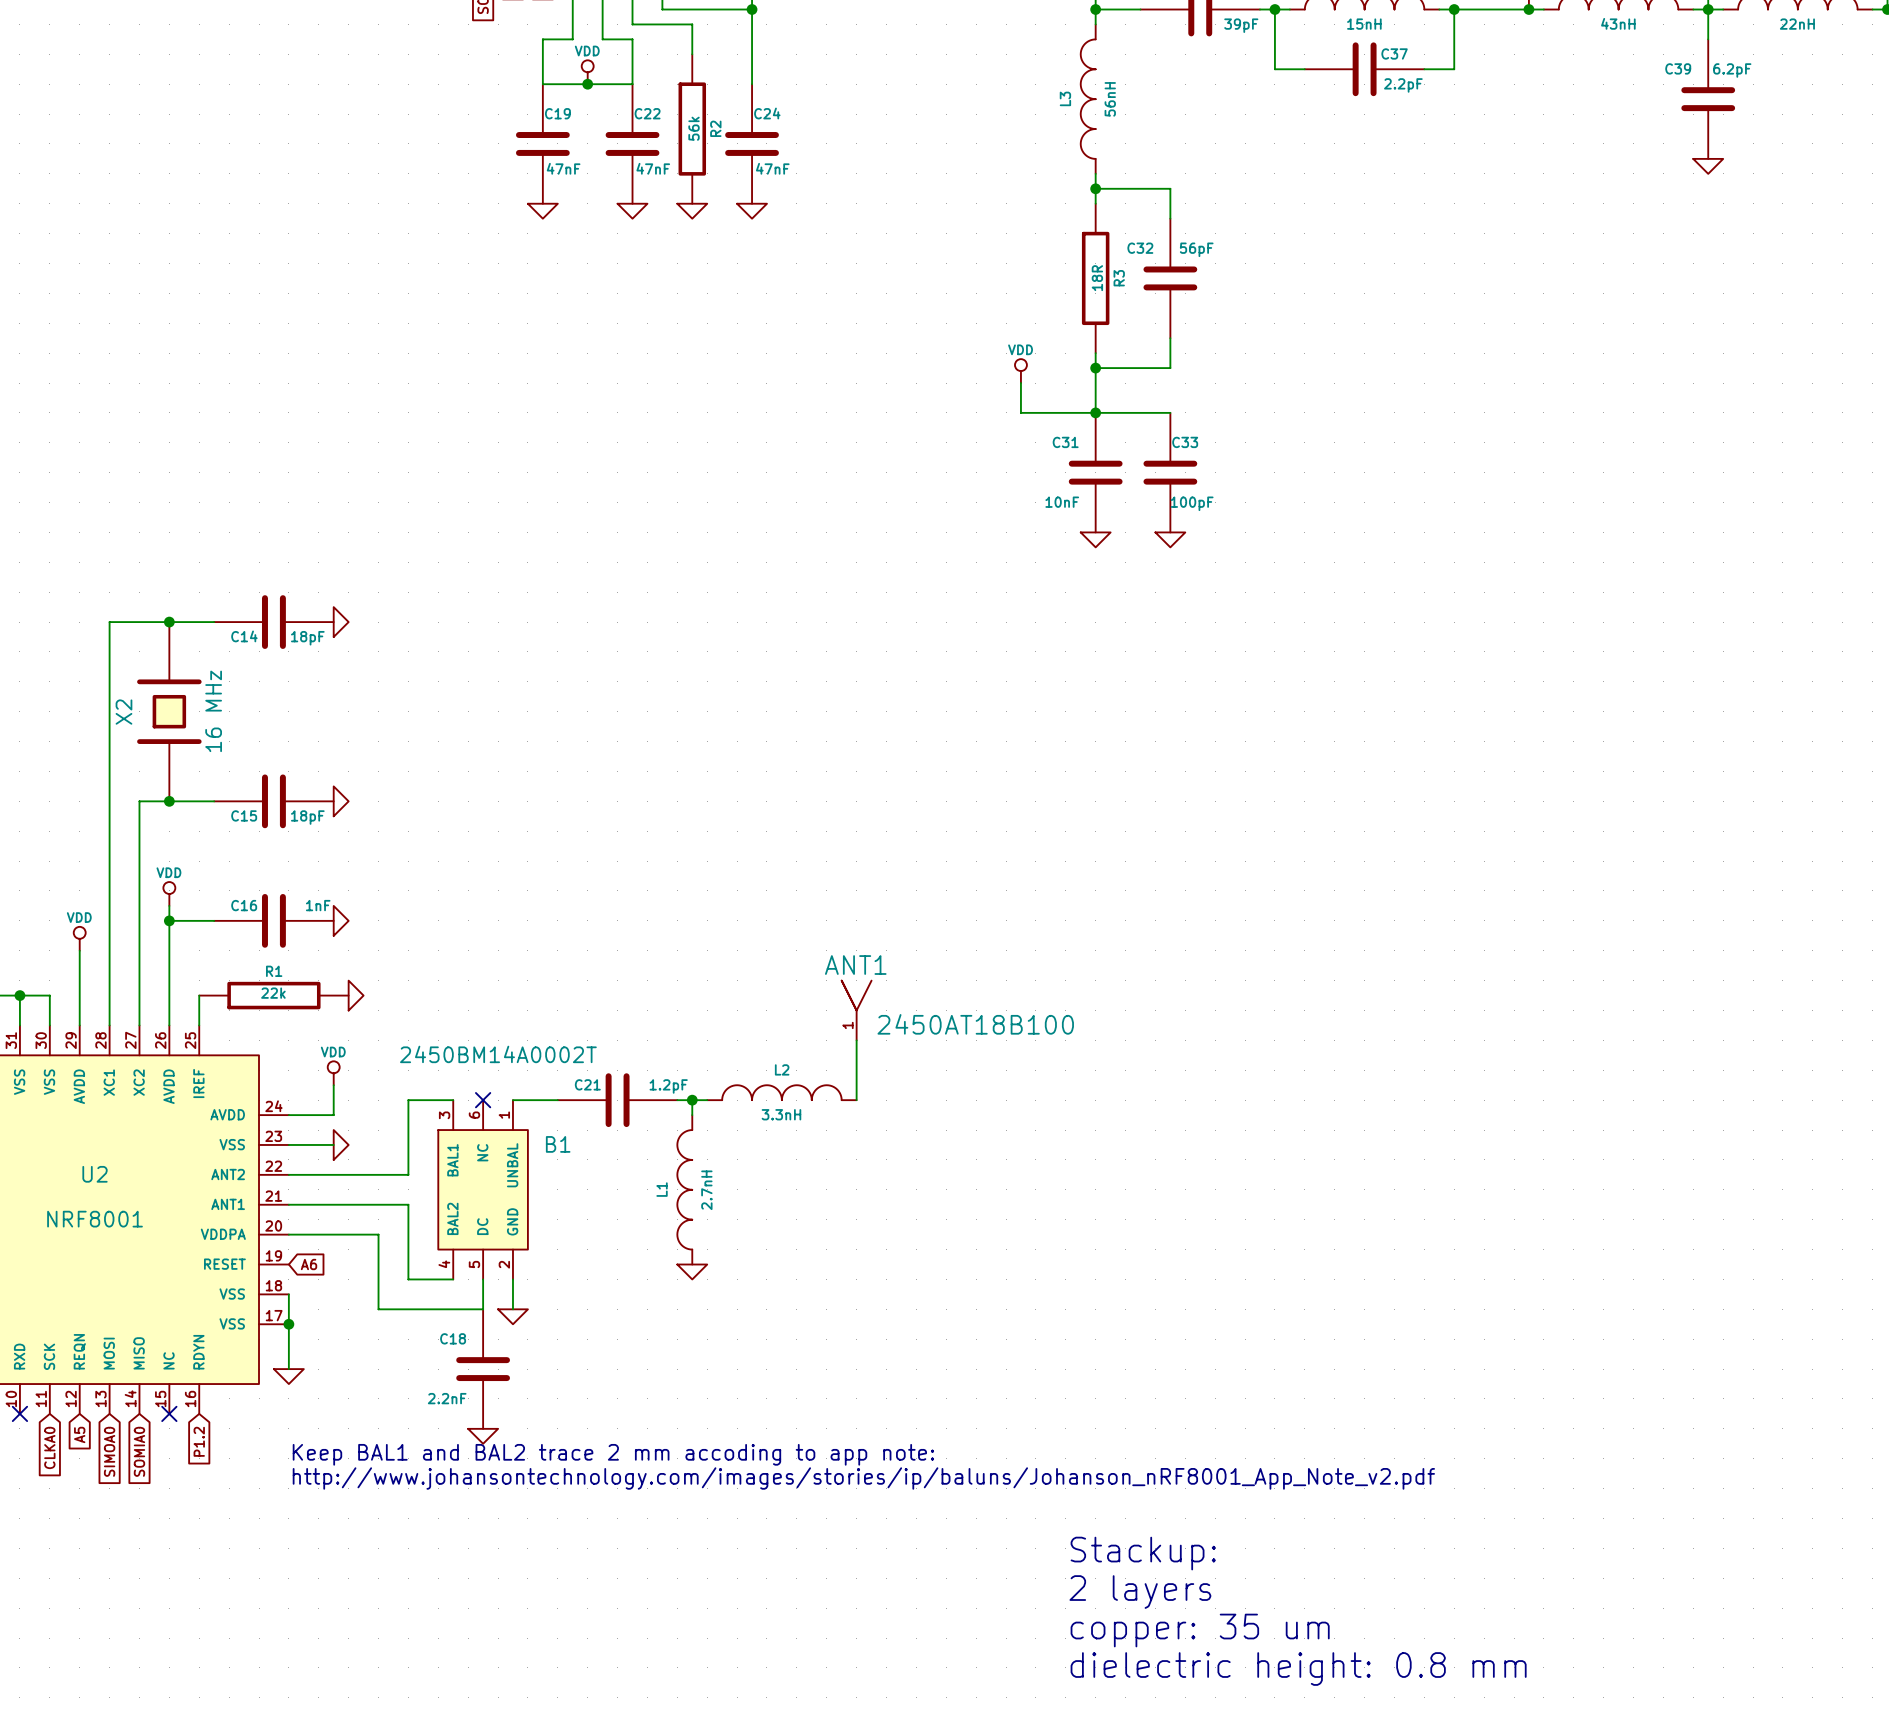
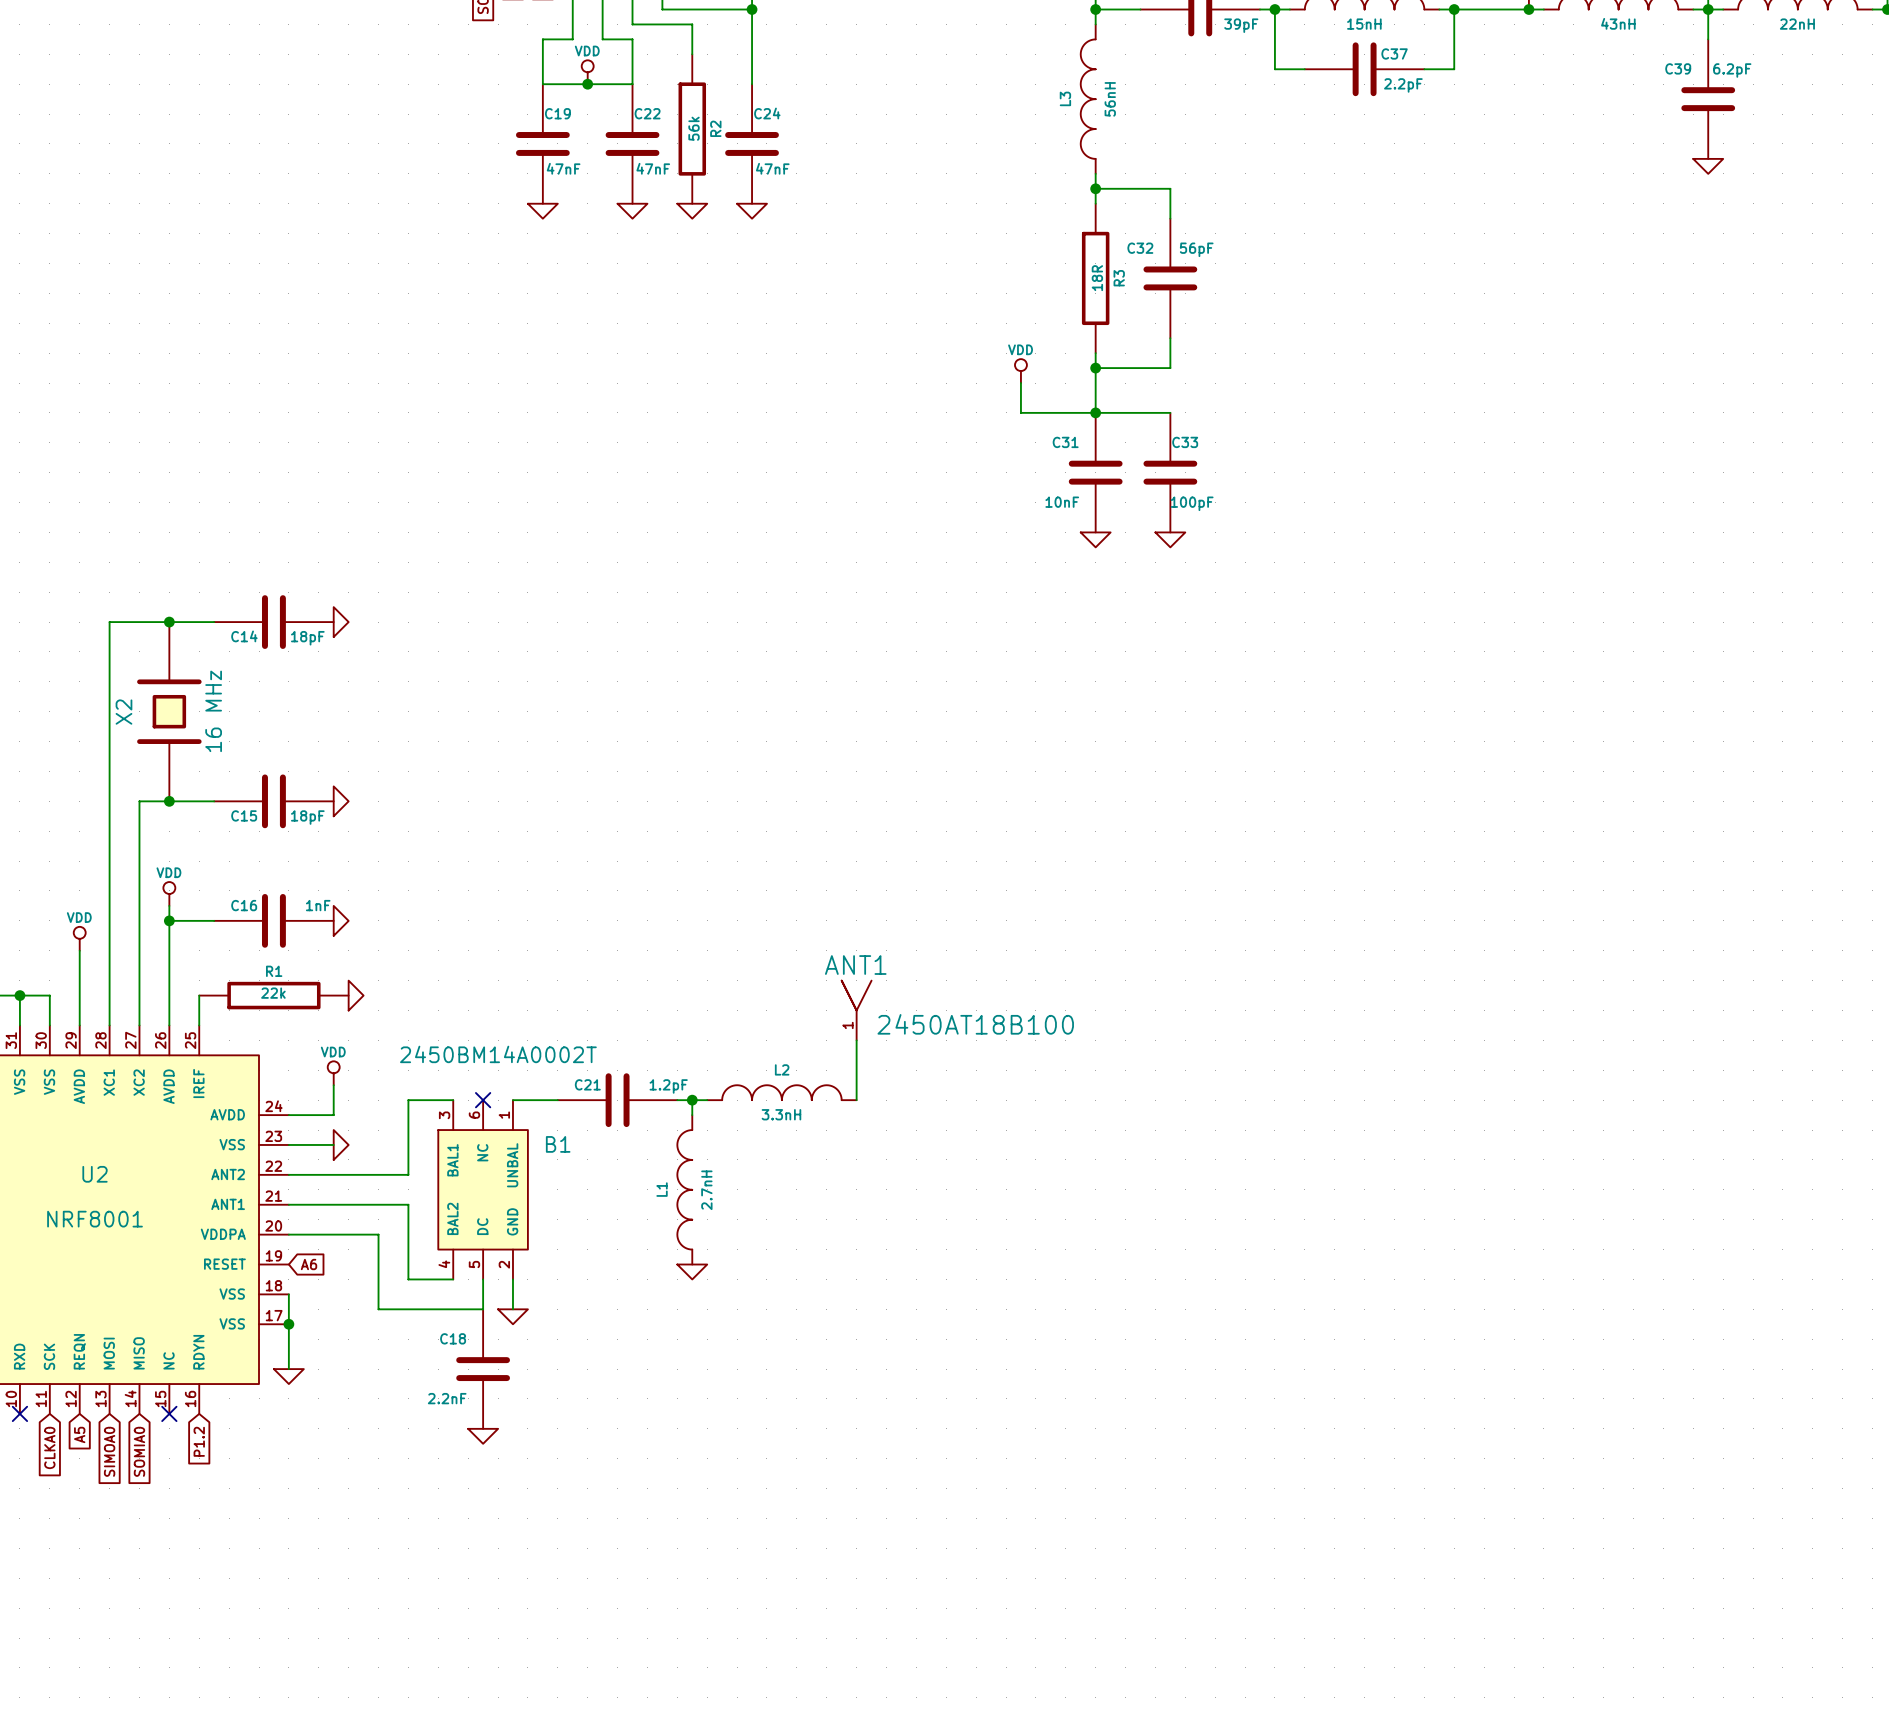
text: Keep BAL1 and BAL2 trace 2 mm accoding to app note: (613, 1454) -> none
text: http://www.johansontechnology.com/images/stories/ip/baluns/Johanson_nRF8001_App_Note_v2.pdf (863, 1478) -> none
text: Stackup: (1143, 1553) -> none
text: 2 layers (1140, 1592) -> none
text: copper: 35 um (1200, 1630) -> none
text: dielectric height: 0.8 mm (1298, 1669) -> none

